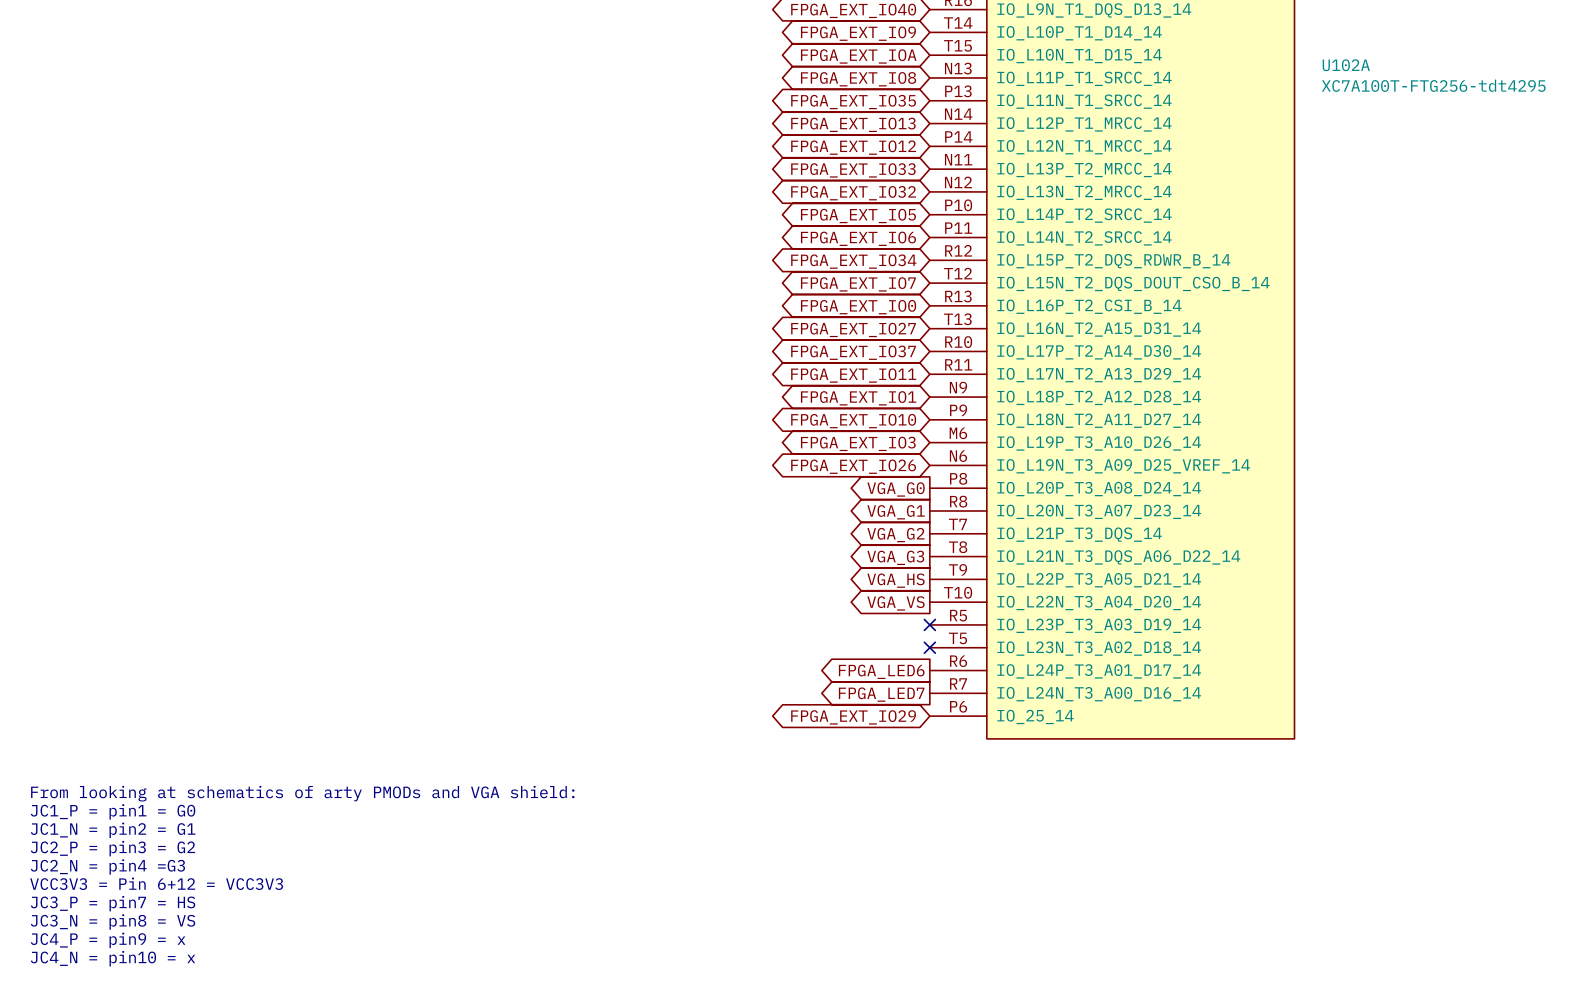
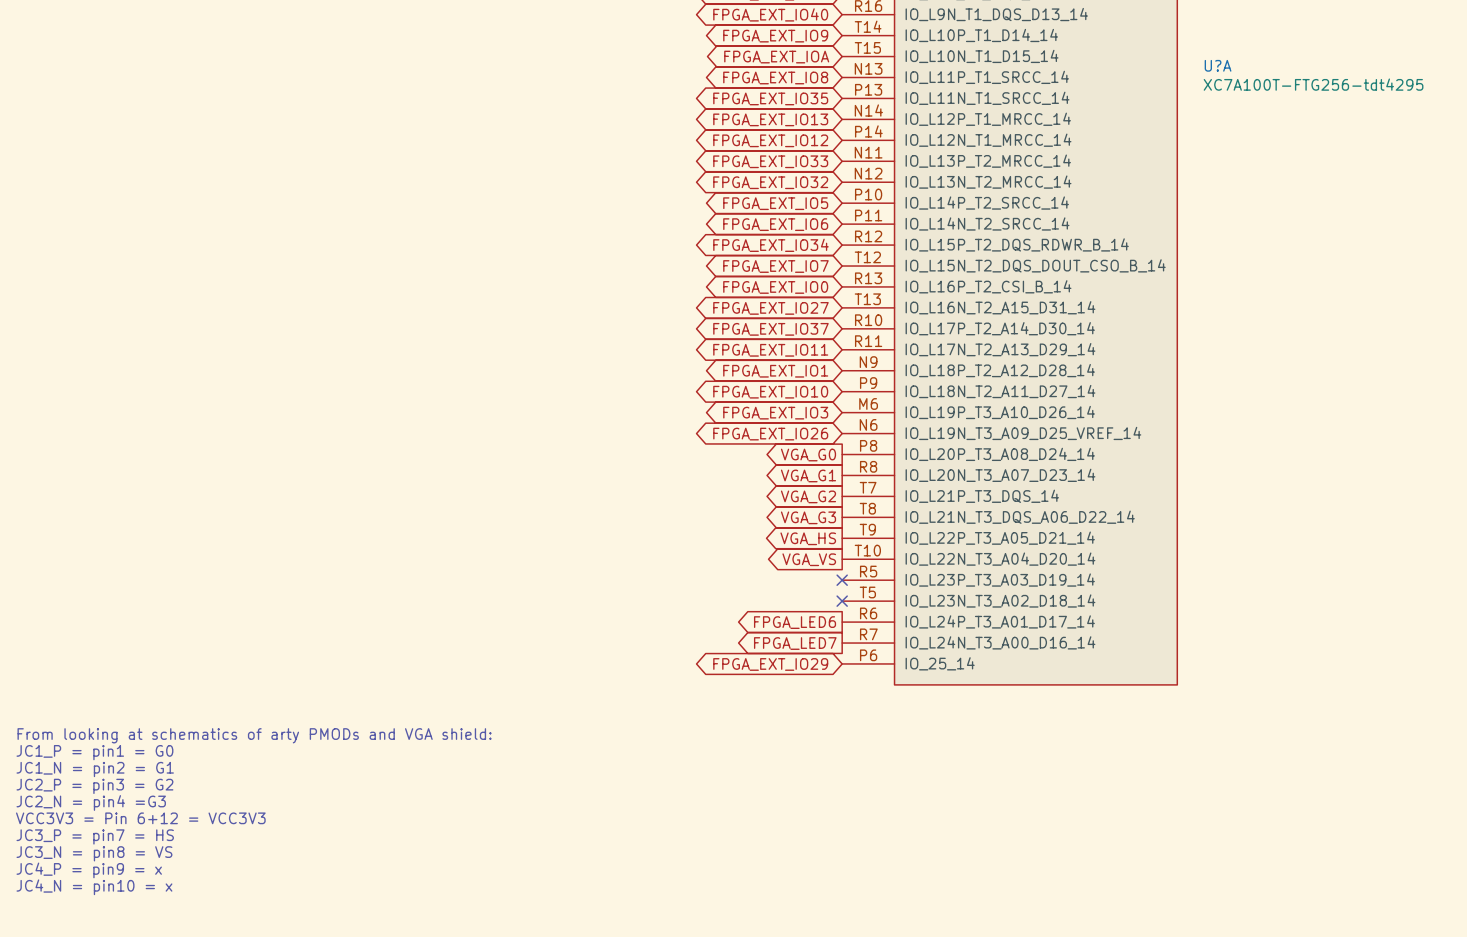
U102A name: U102A (1346, 65) -> U?A (1218, 65)

